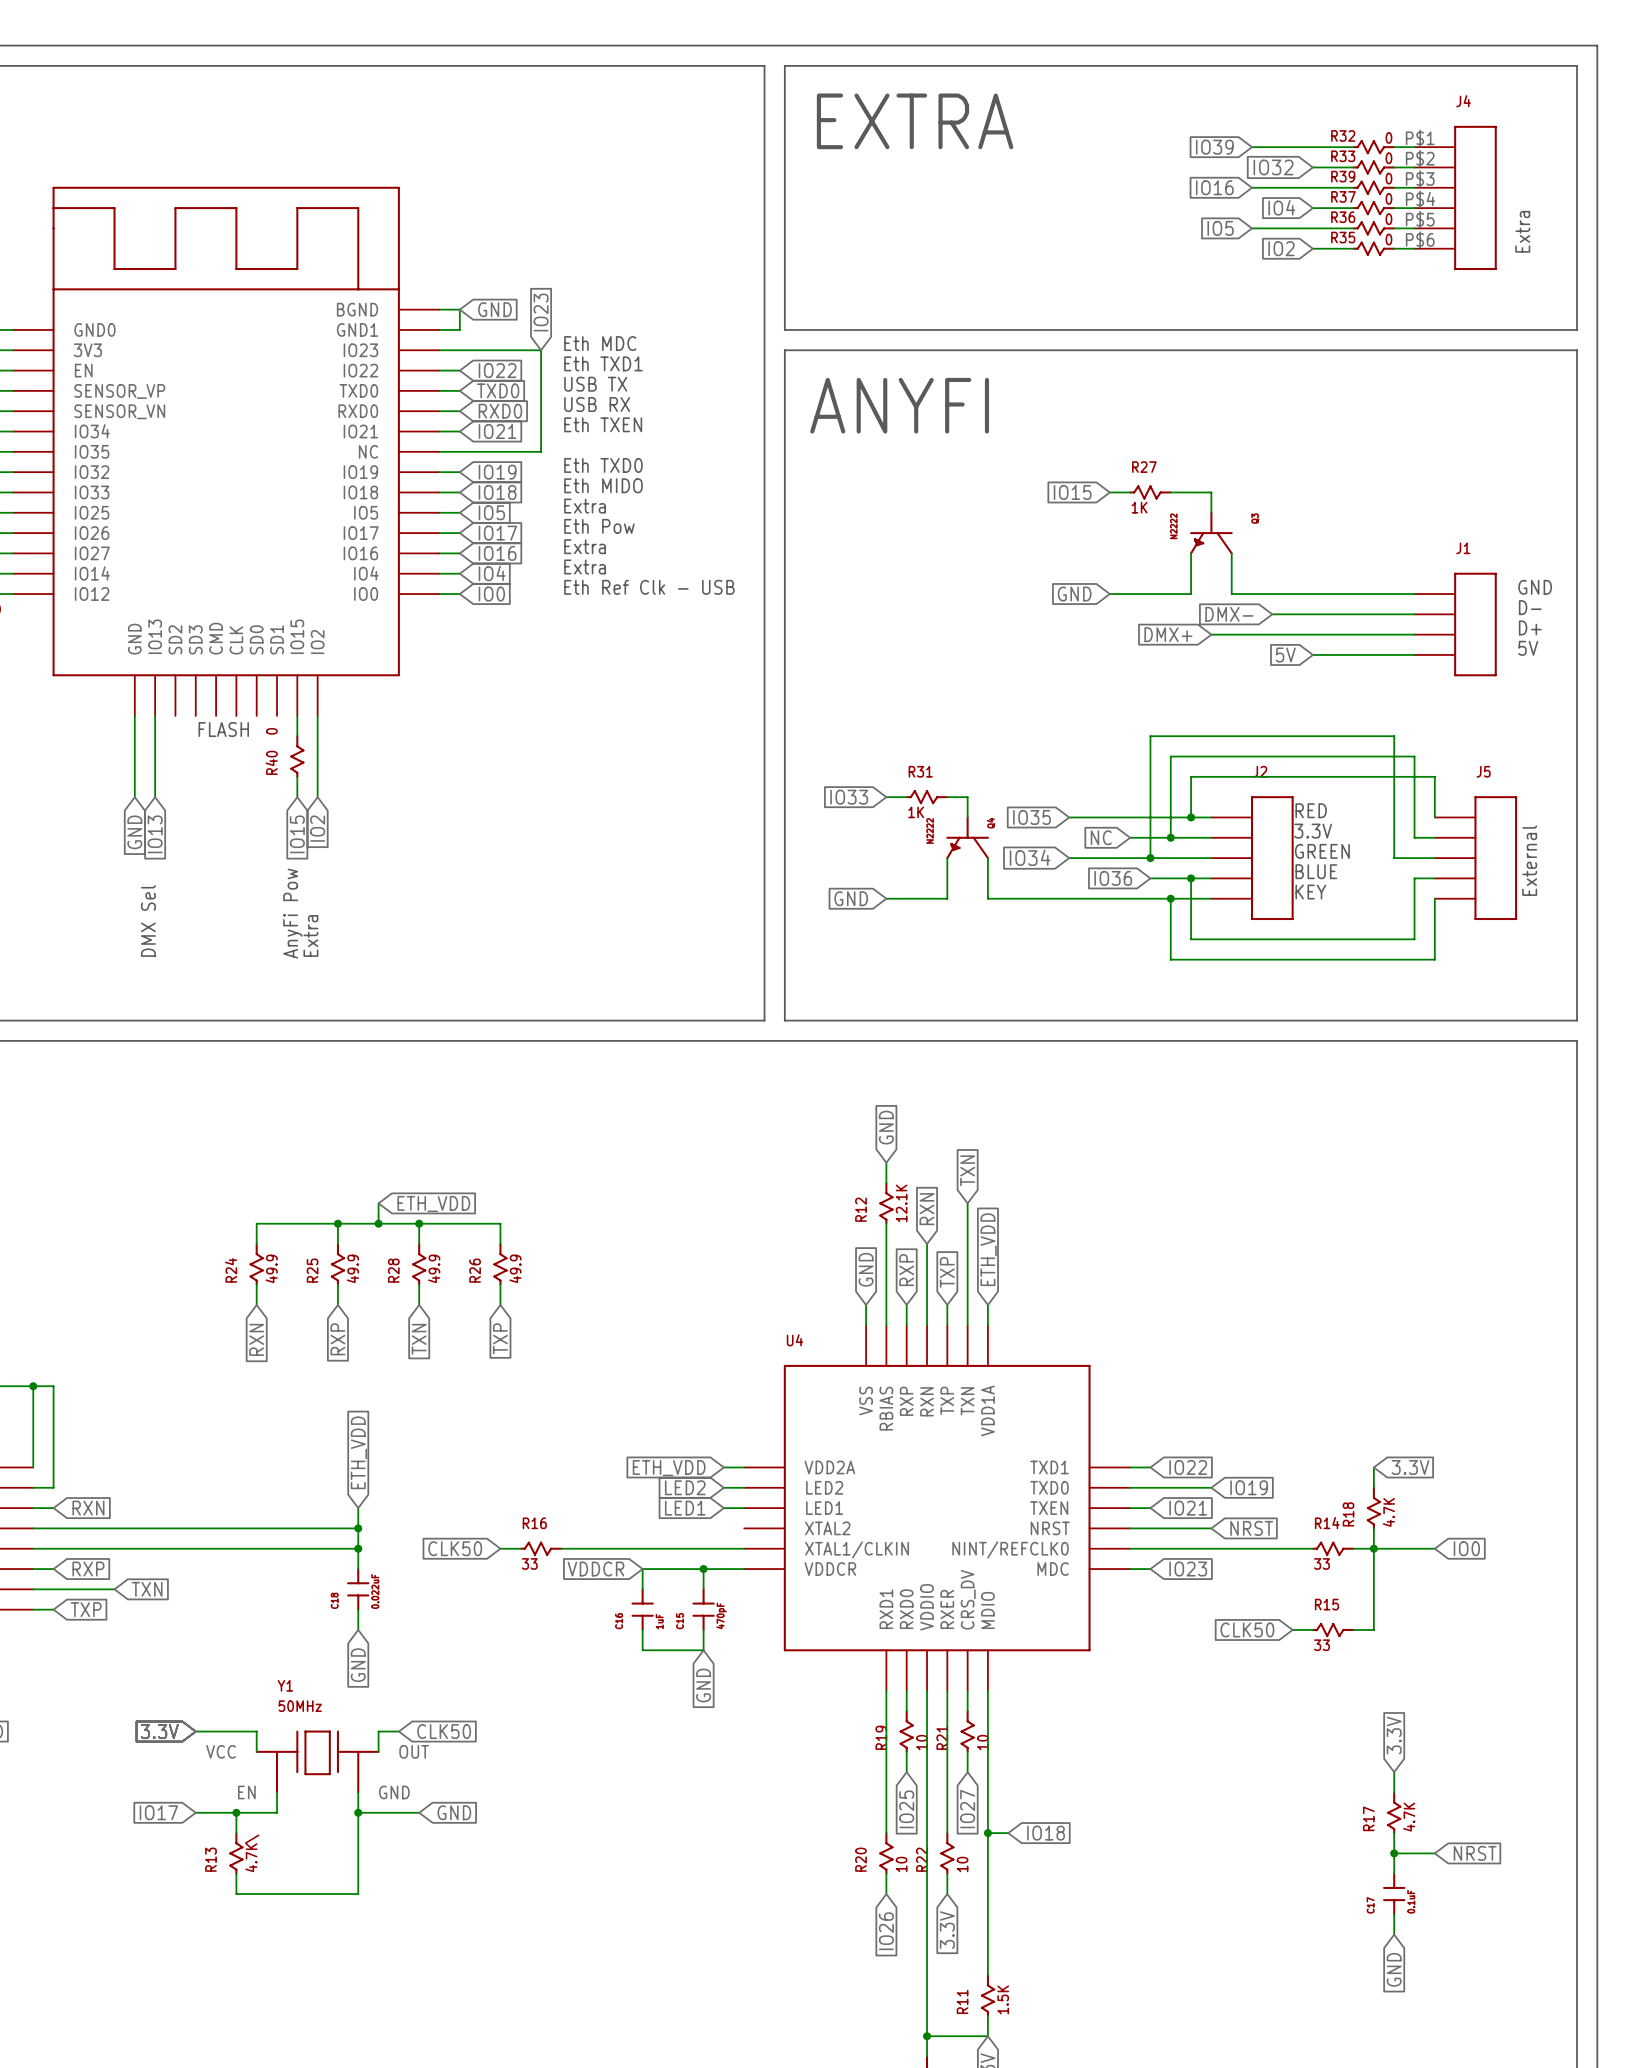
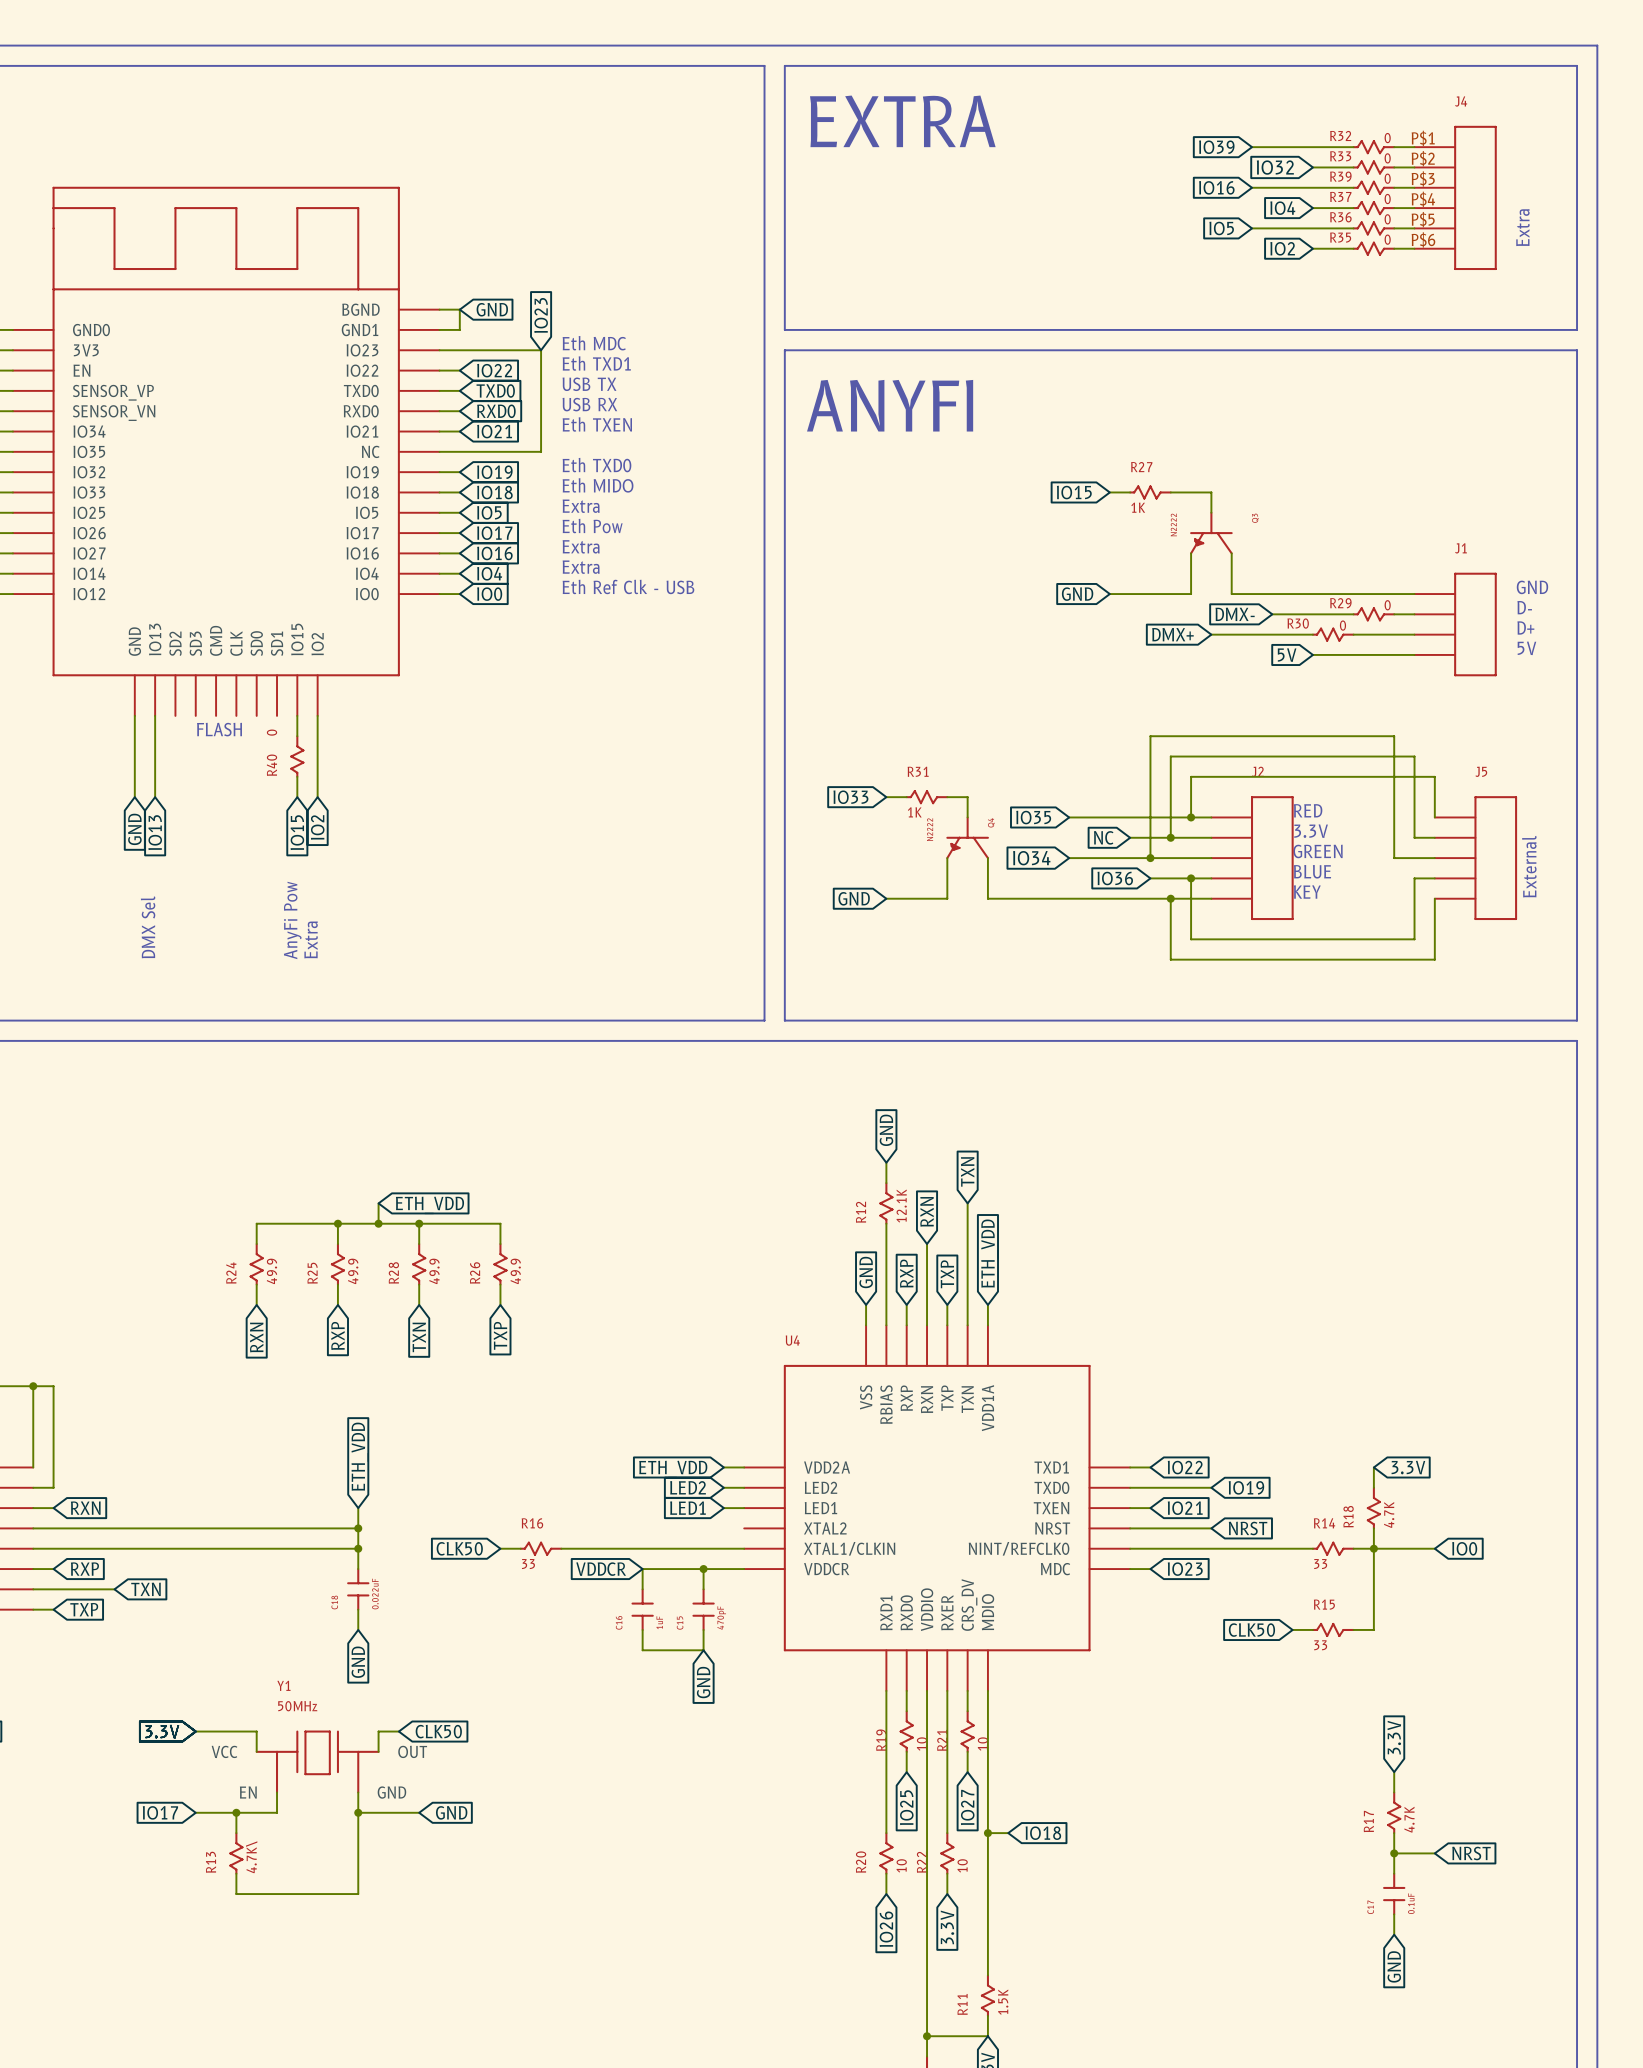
R29: none -> 0 (1373, 614)
R30: none -> 0 (1333, 634)

